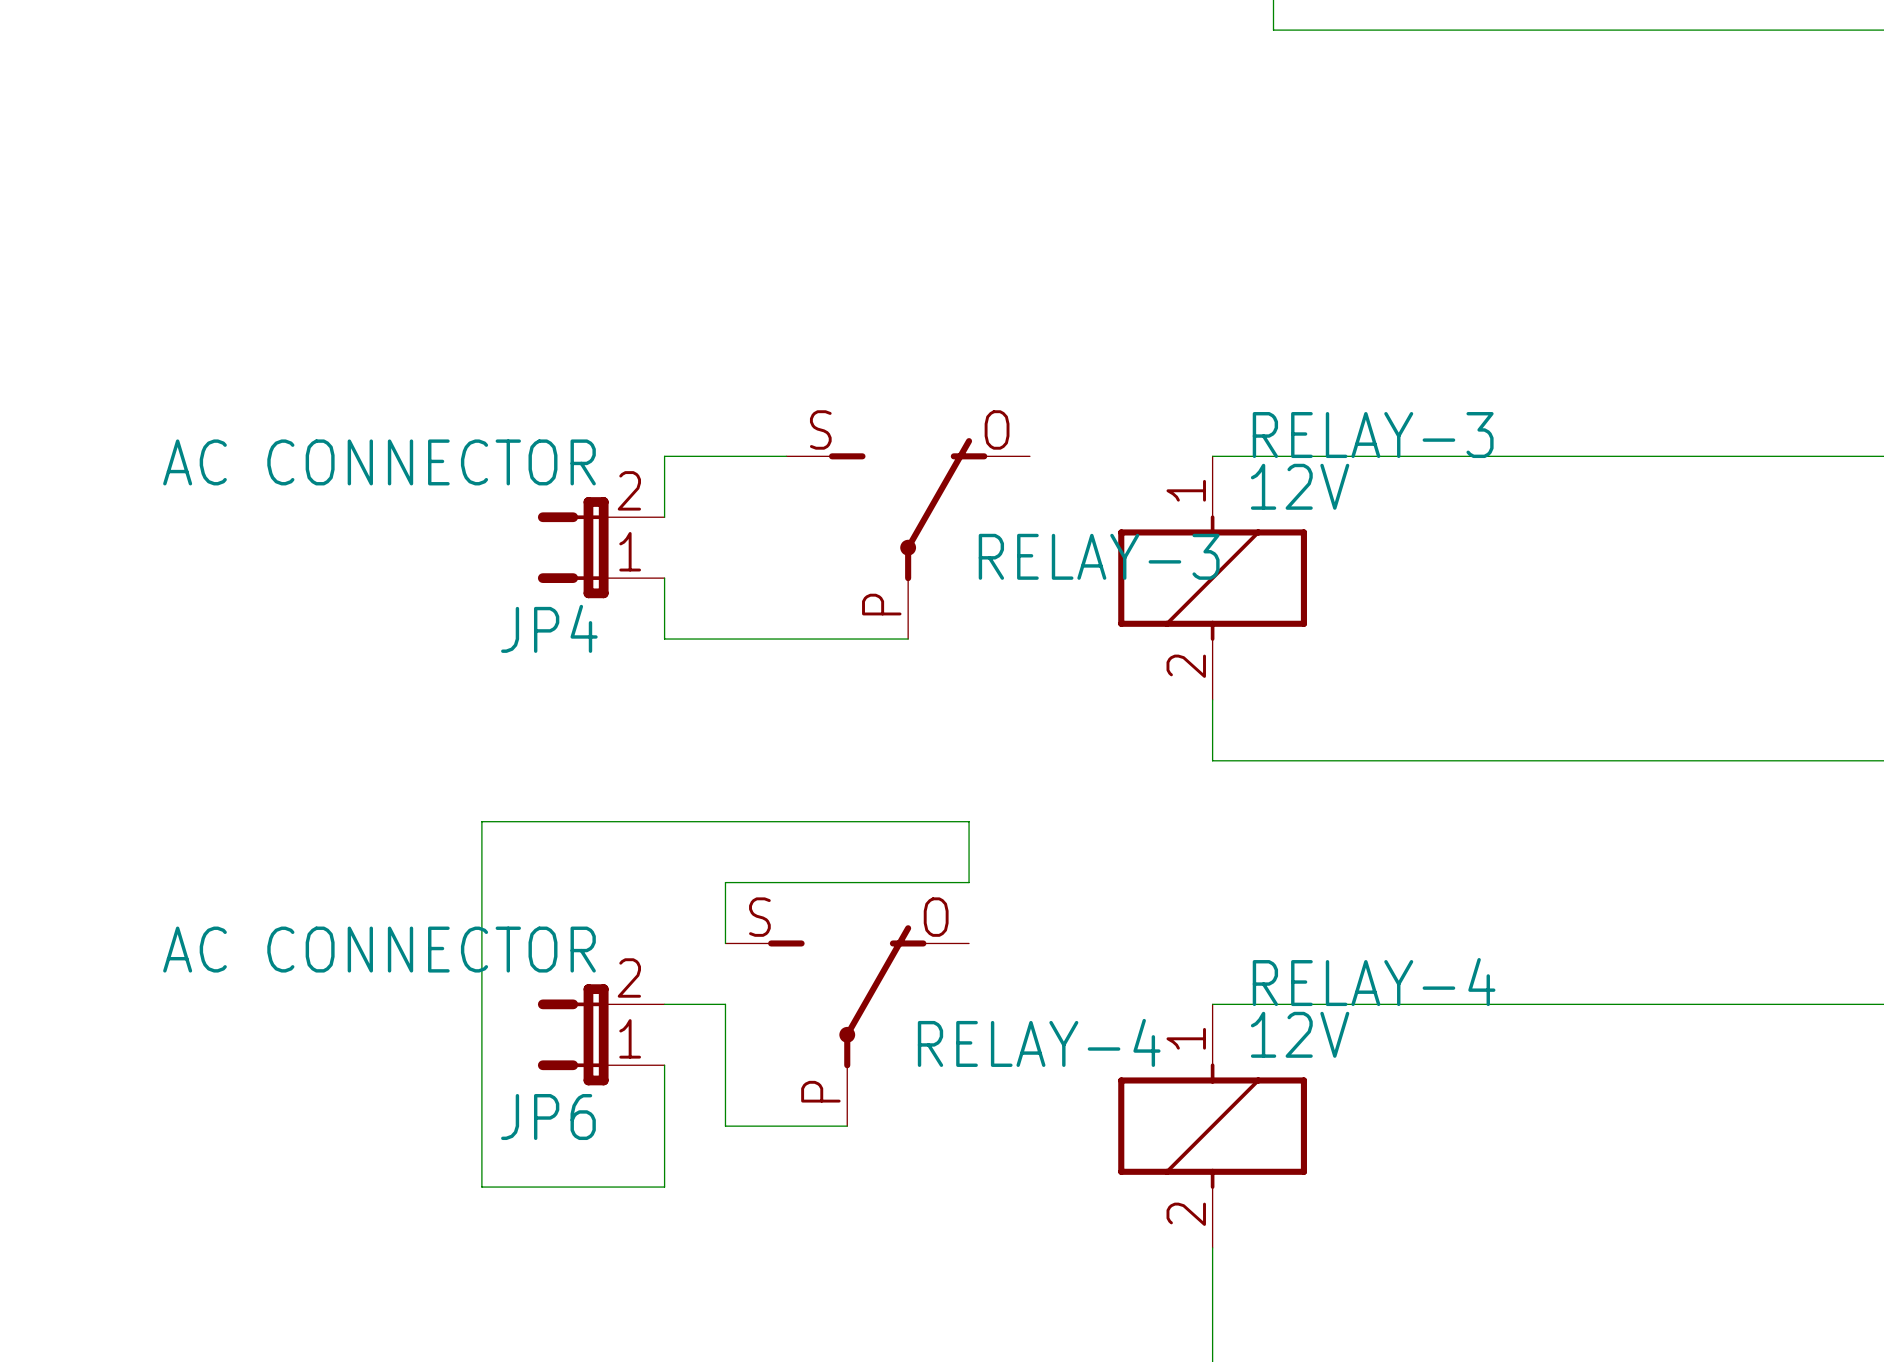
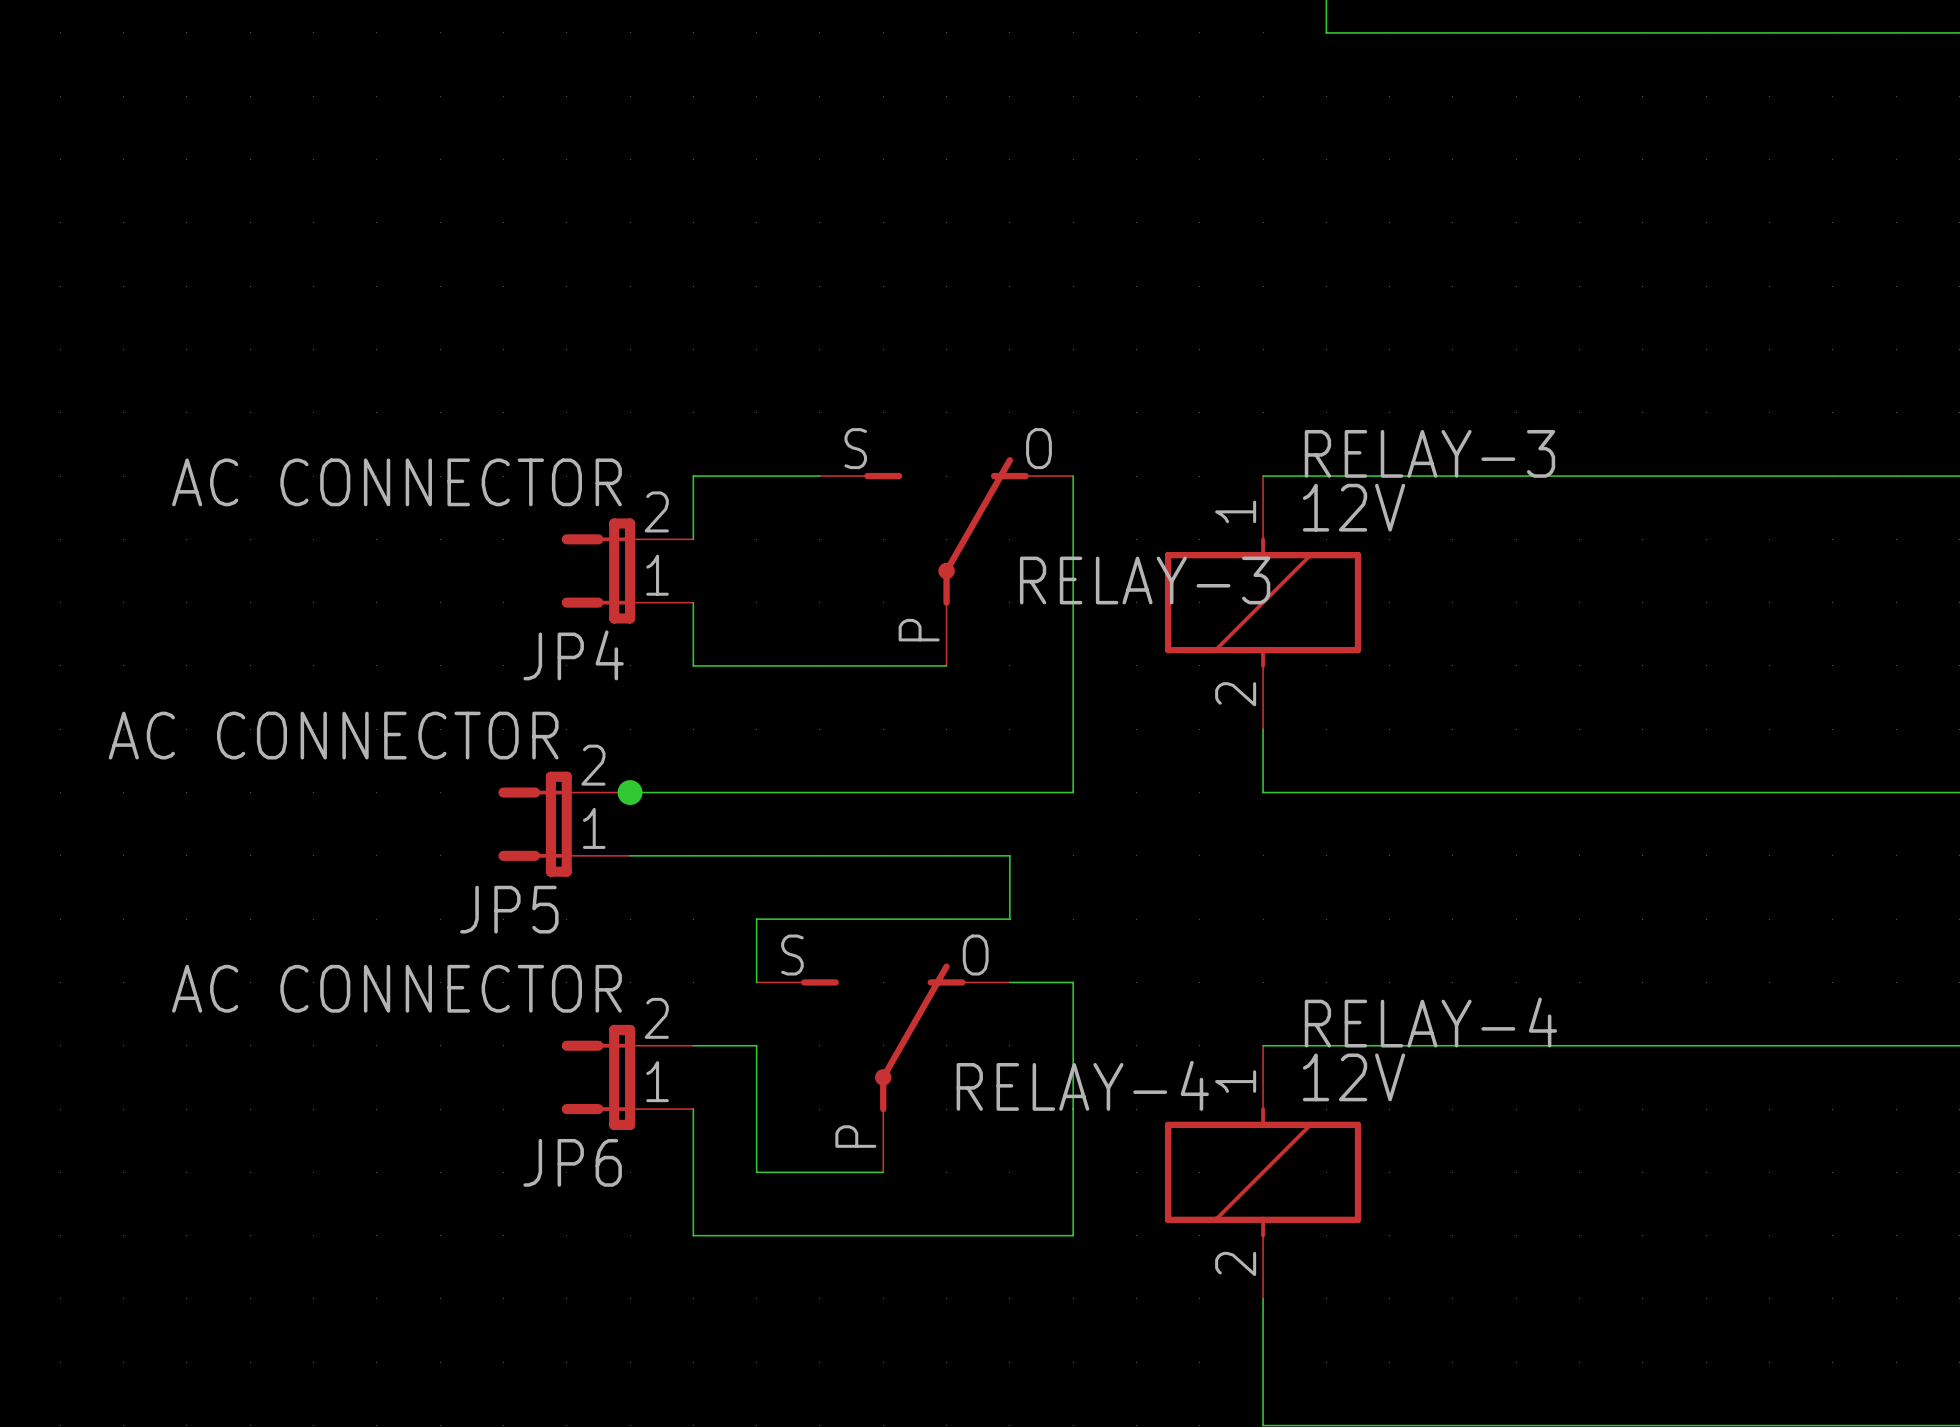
wire: none -> (1073, 476) (1073, 792) (630, 792)
junction: none -> (630, 792)
JP5: none -> AC CONNECTOR (564, 824)
wire: (603, 821) (481, 821) (481, 1187) (664, 1187) -> (1009, 982) (1073, 982) (1073, 1235) (693, 1235)

